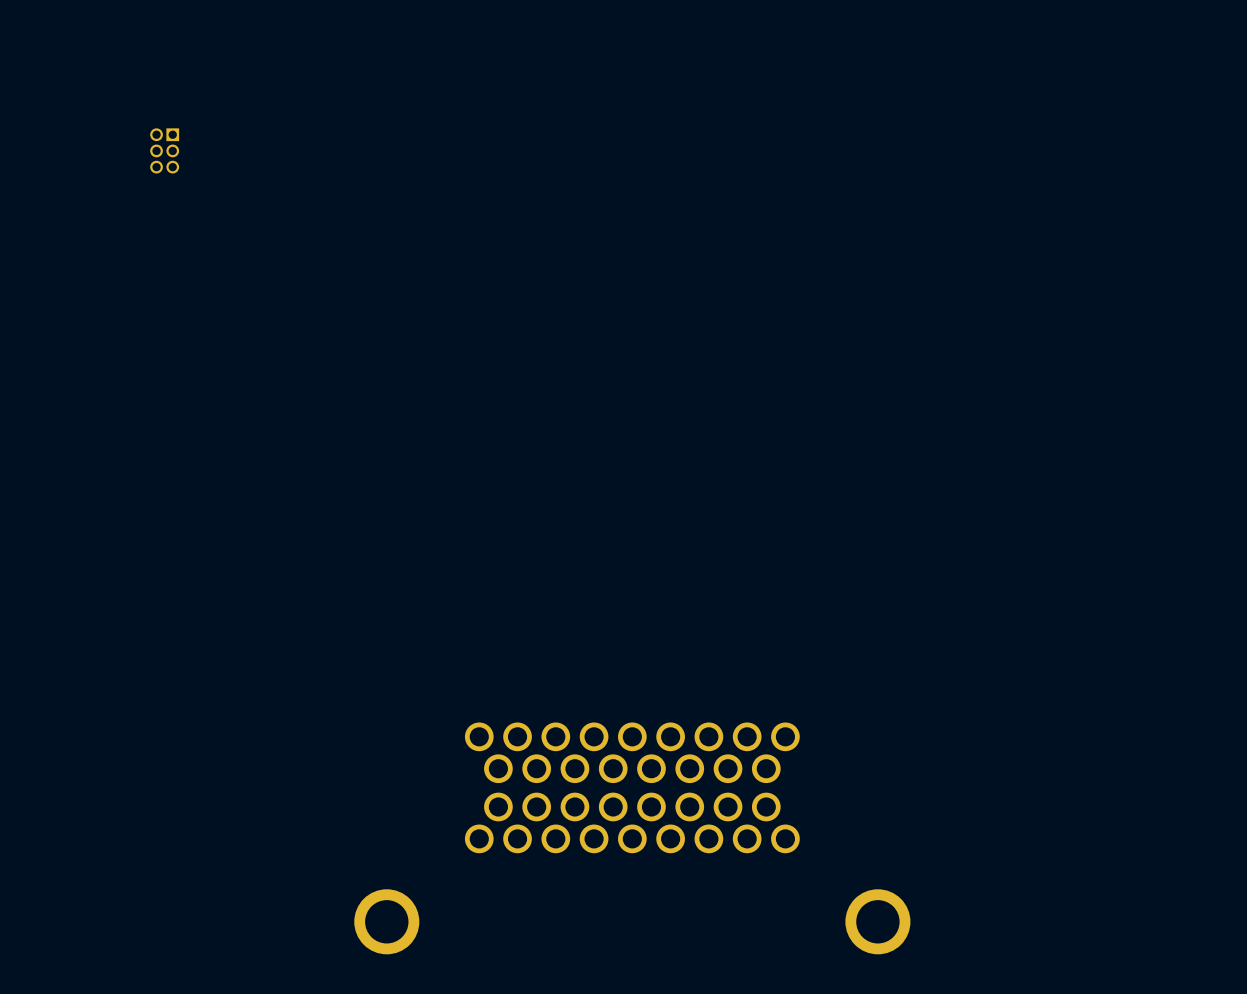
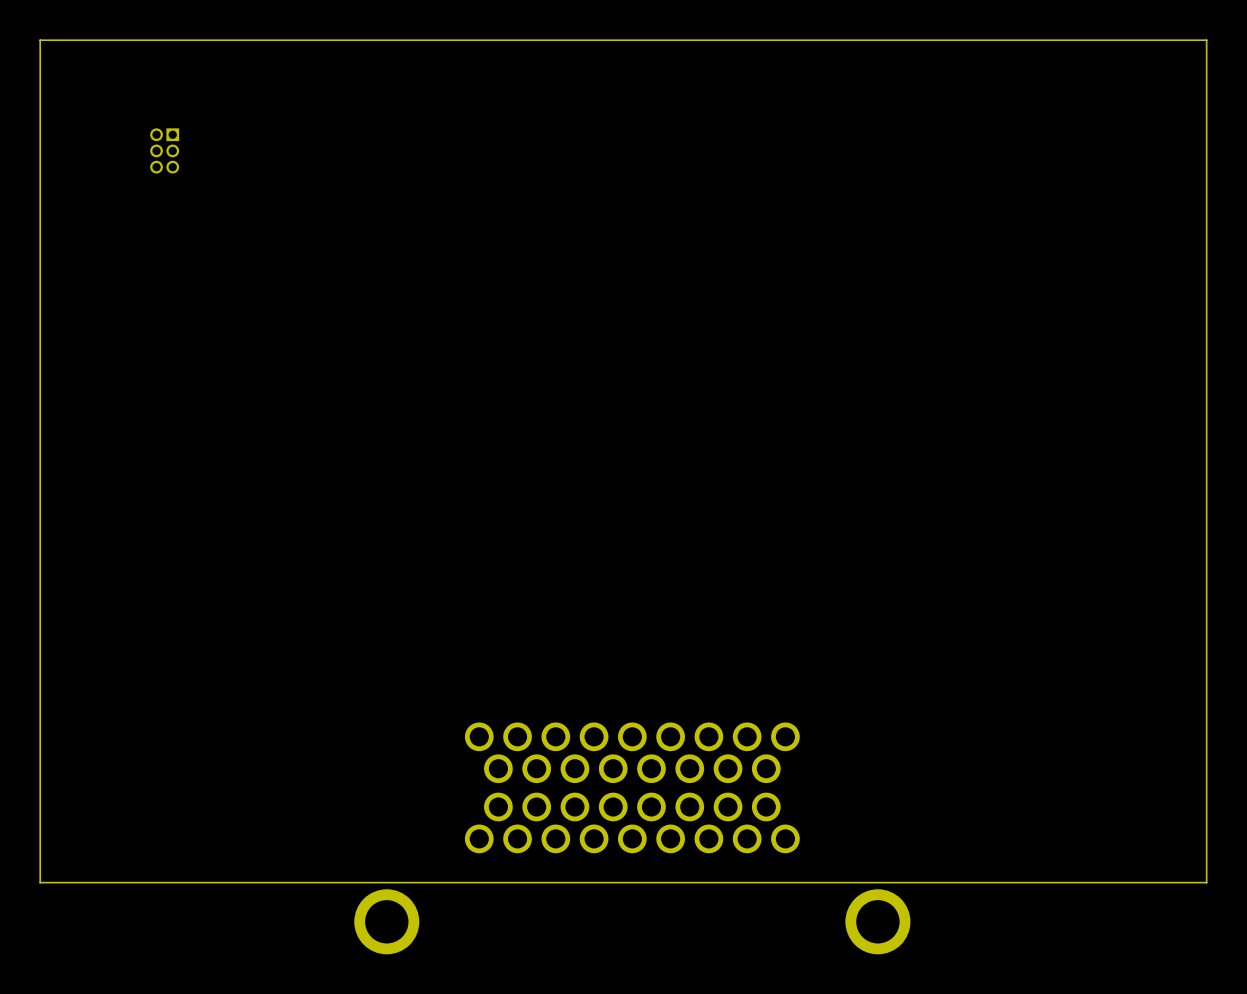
board edge: none -> (1206, 40) (40, 40) (40, 882) (1206, 882) (1206, 40)

